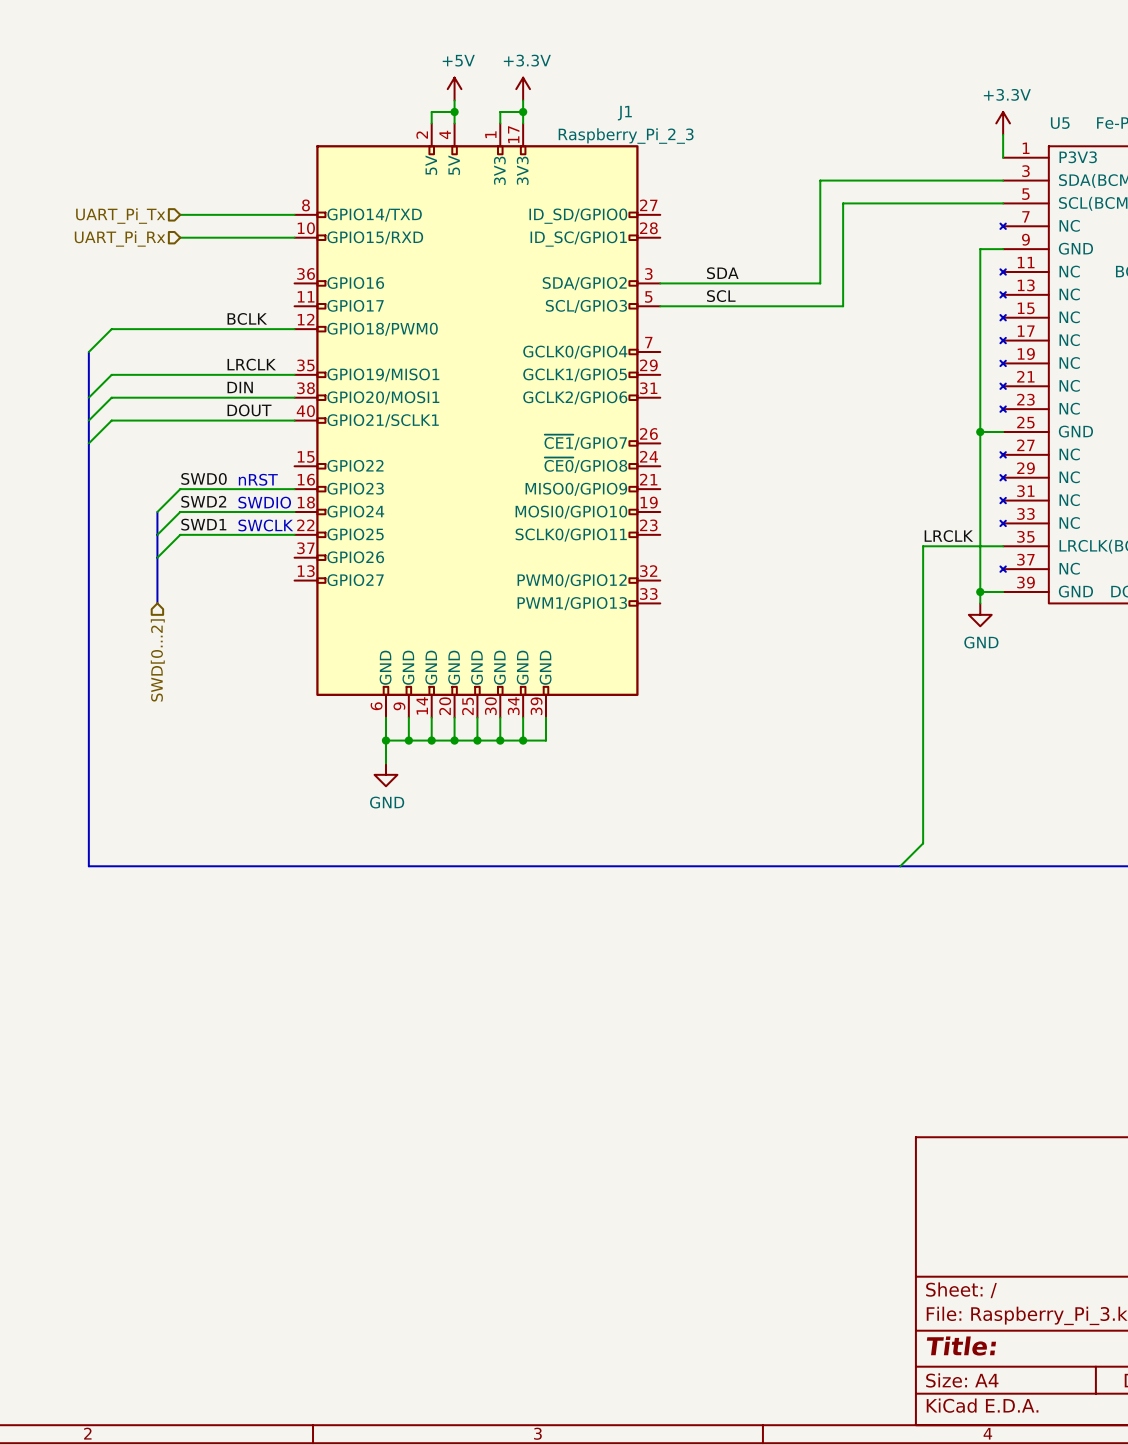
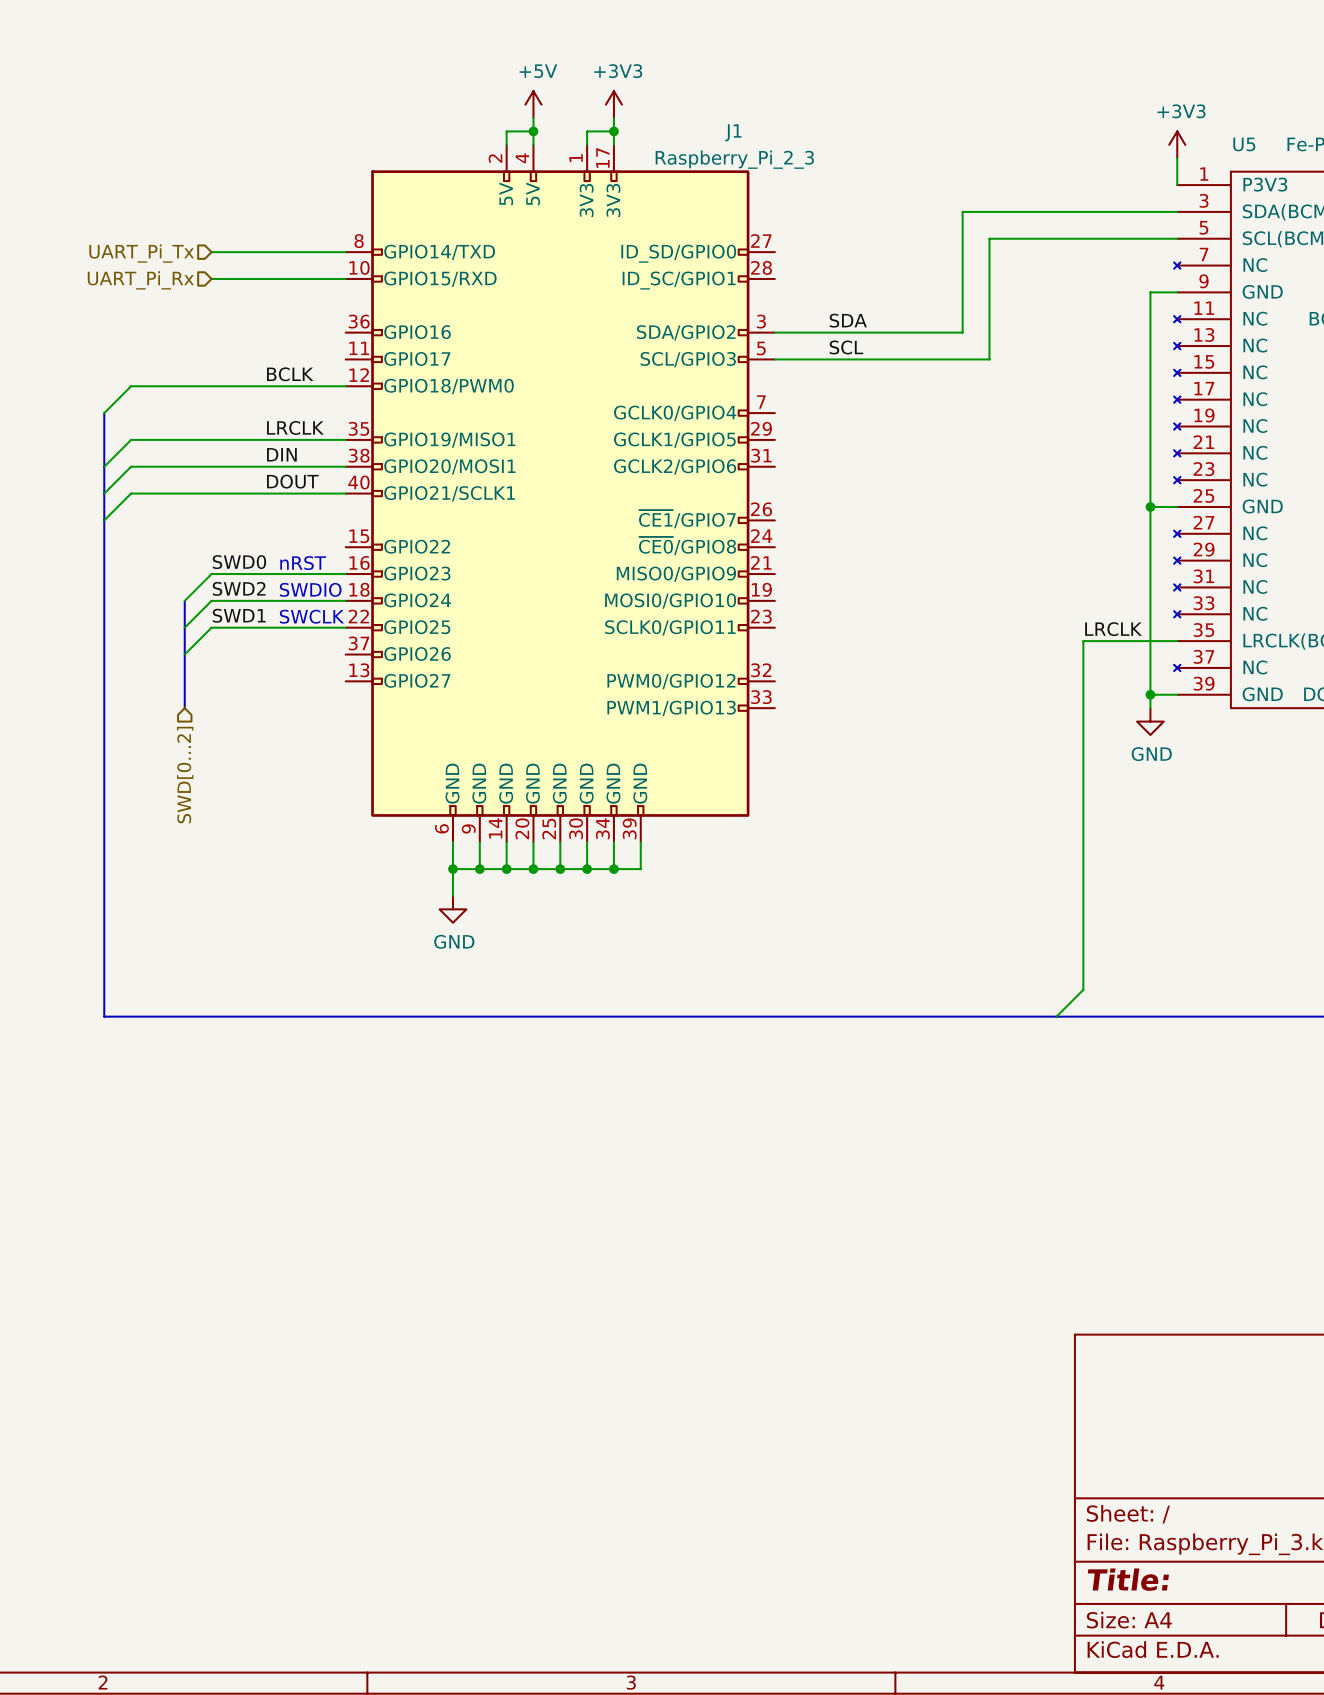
power symbol: +3.3V (523, 89) -> +3V3 (613, 104)
power symbol: +3.3V (1003, 123) -> +3V3 (1177, 144)

